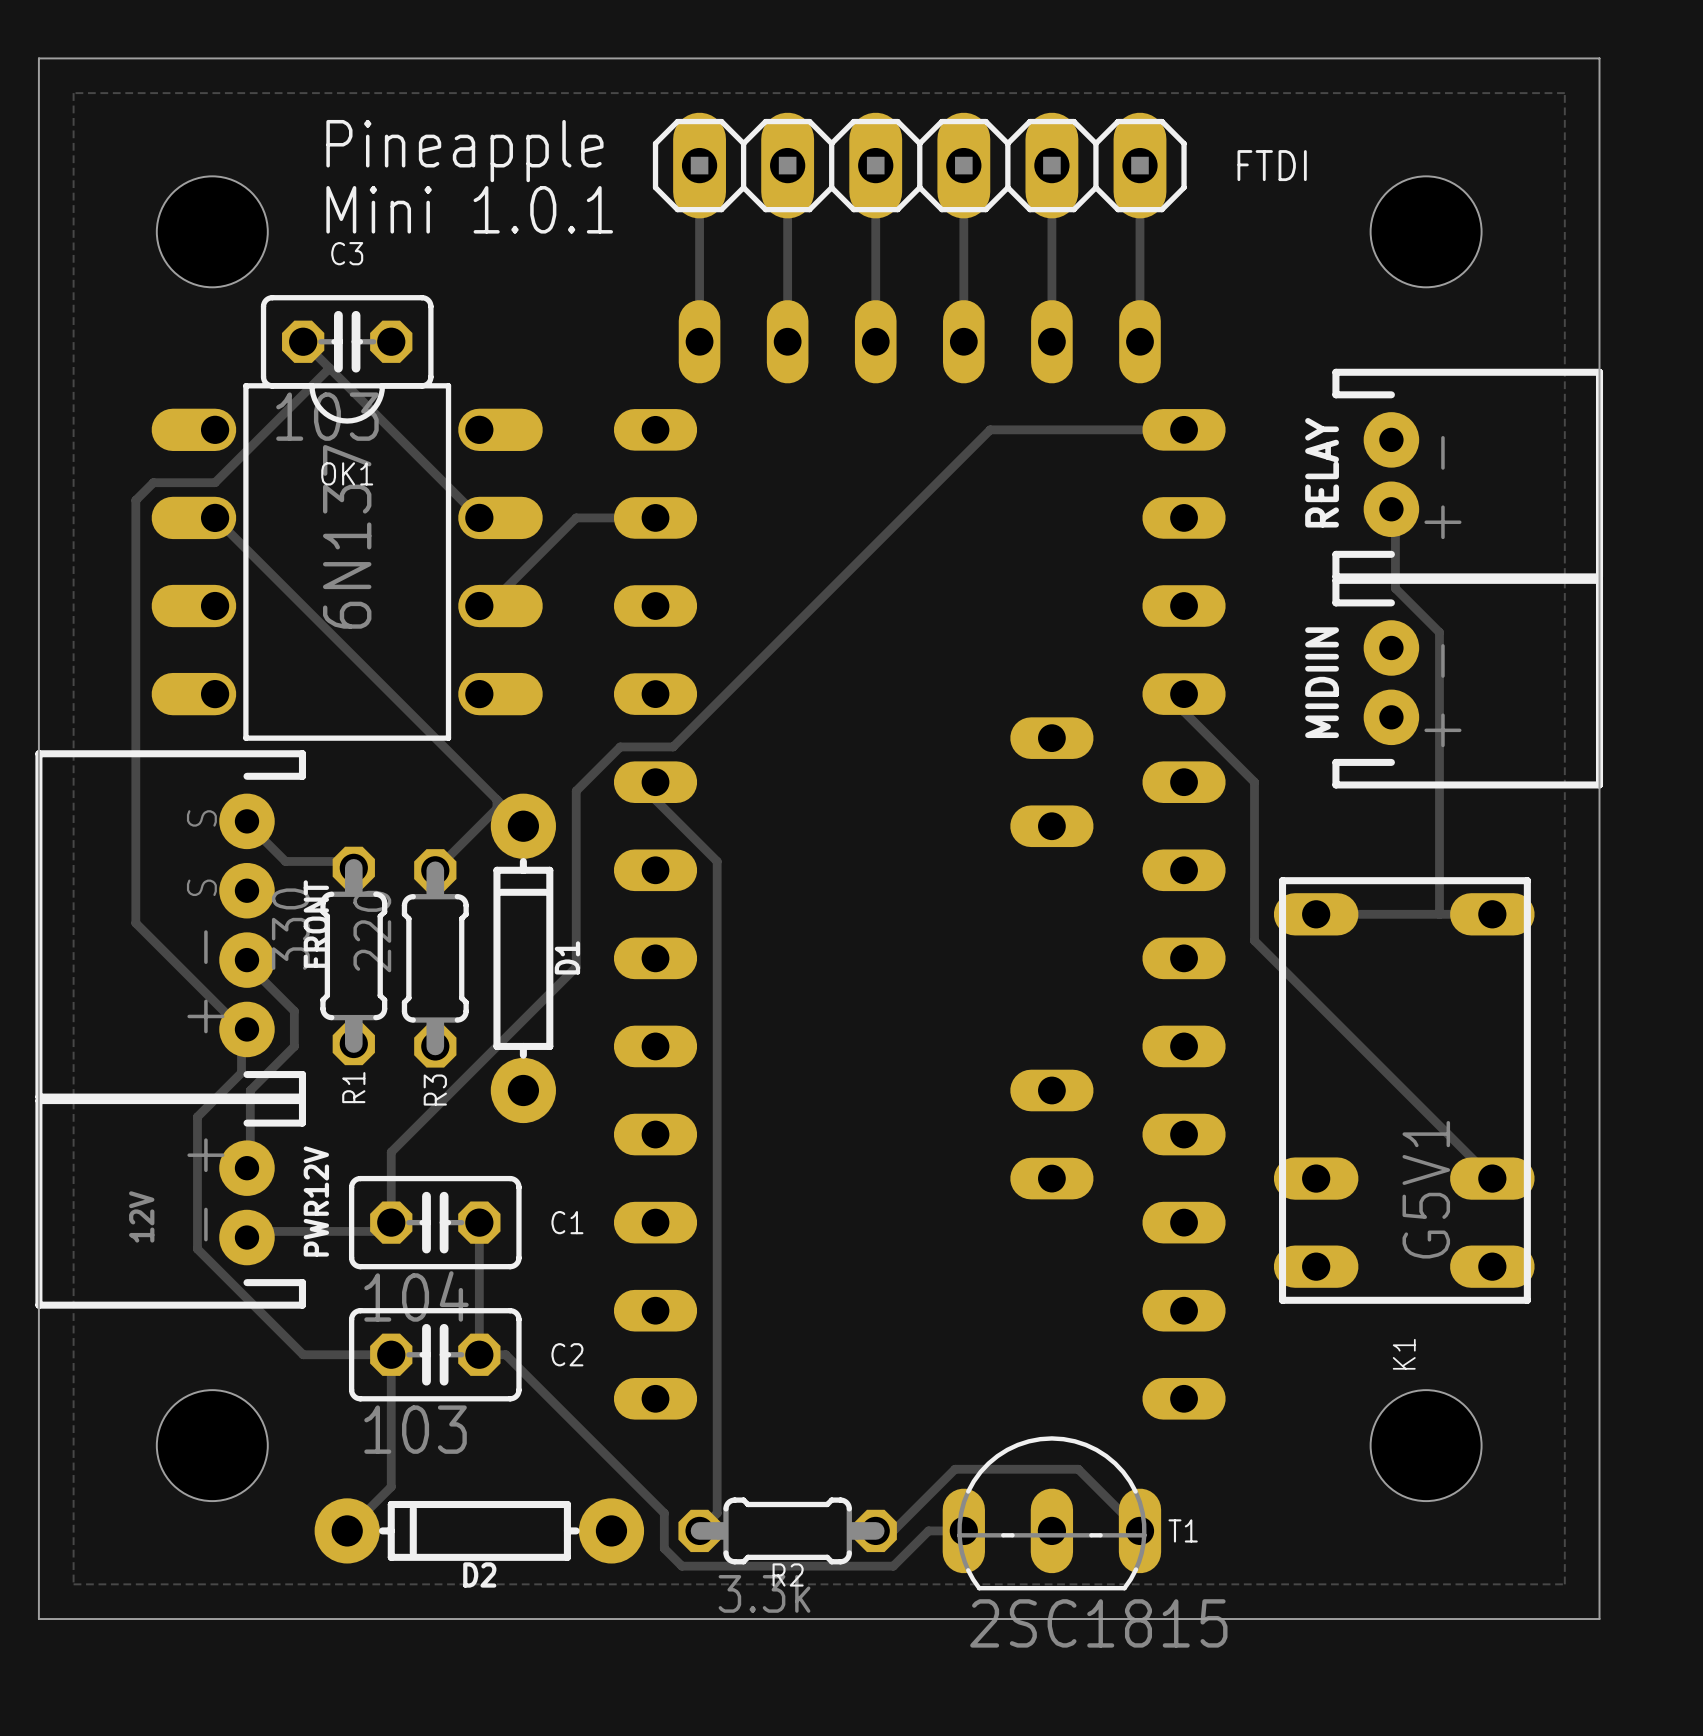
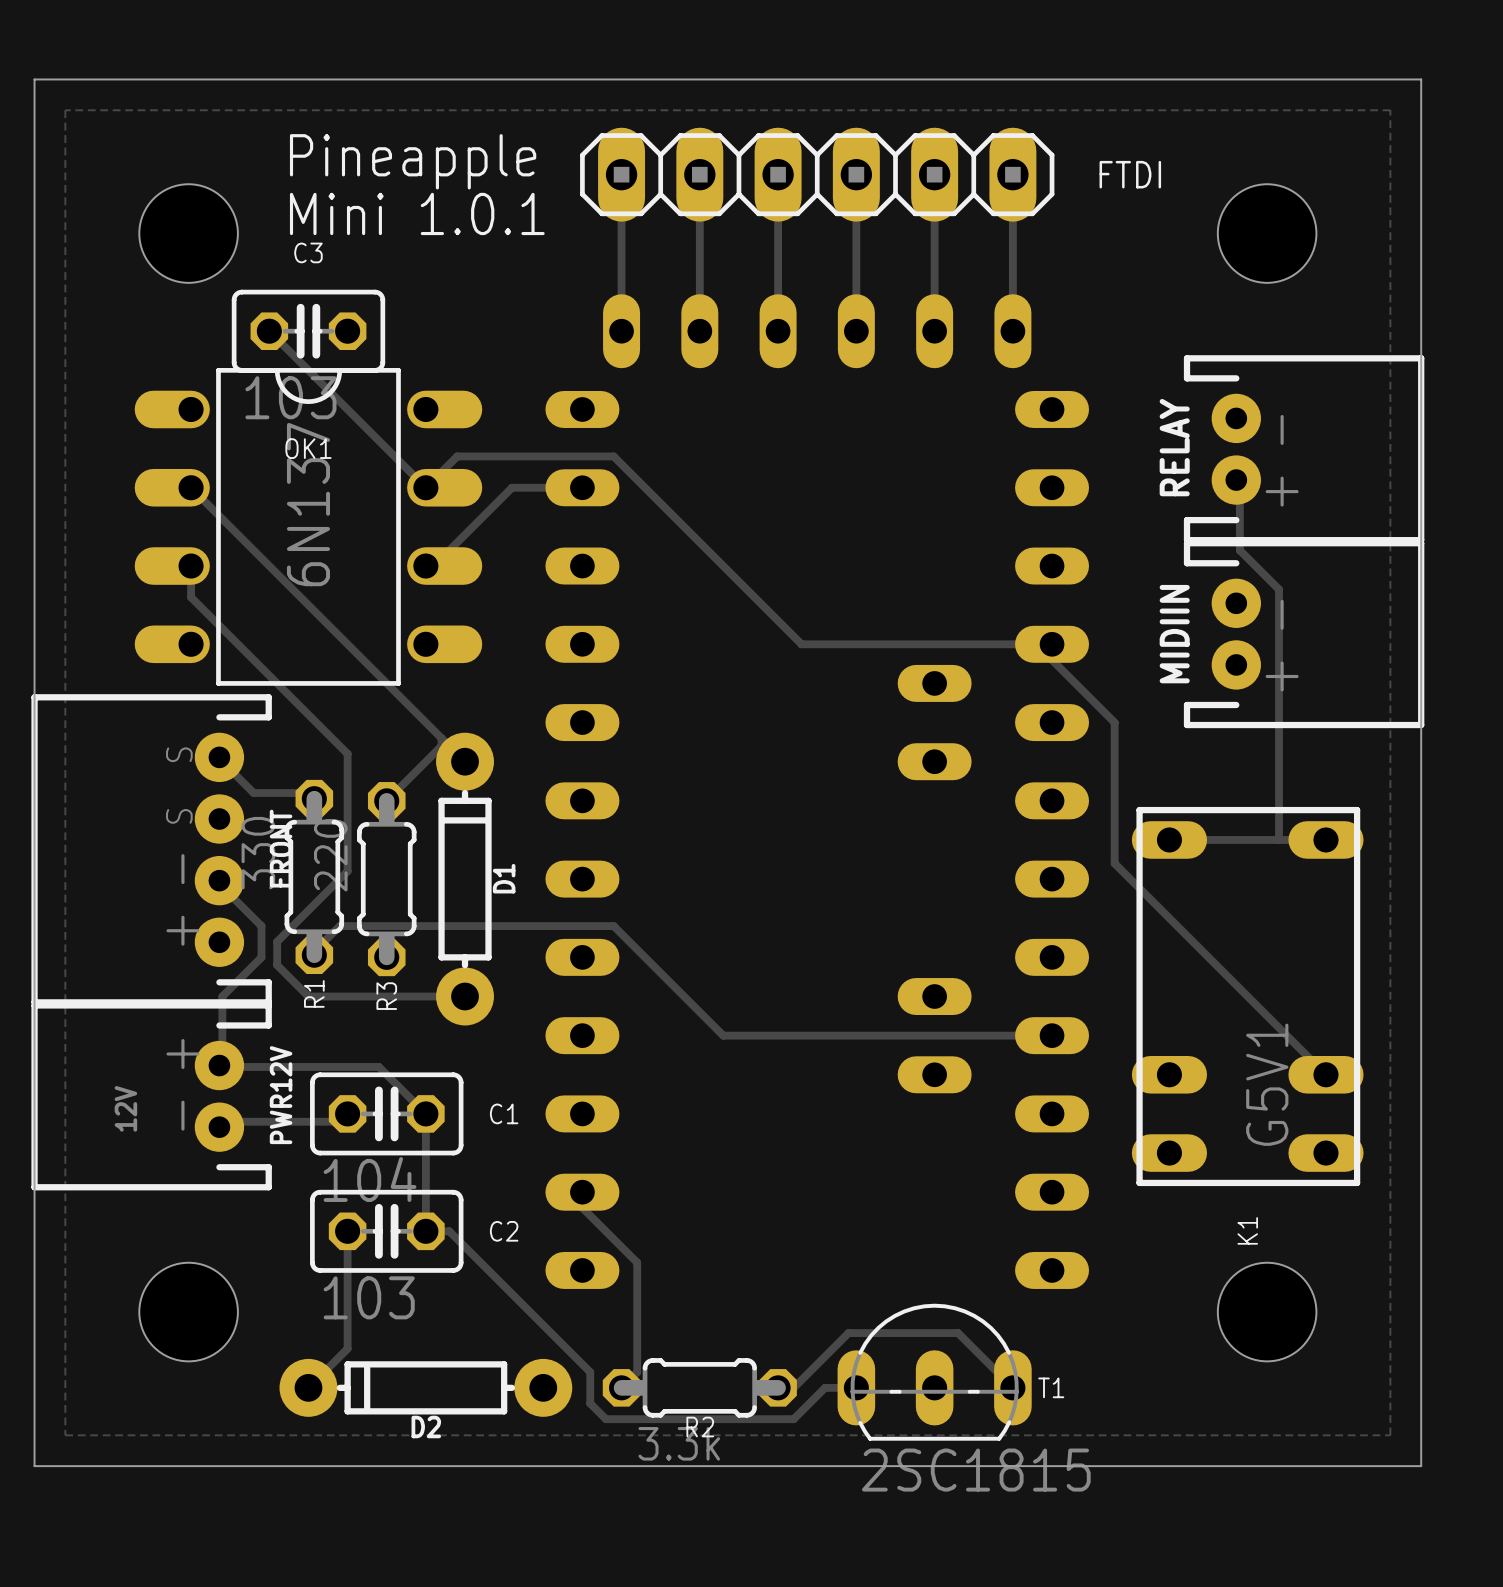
track: (329, 368) (215, 482) (153, 482) (135, 500) (135, 923) (241, 1028) (246, 1029) (241, 1037) (241, 1072) (197, 1116) (197, 1249) (303, 1354) (391, 1354) -> none
track: (1184, 429) (990, 429) (673, 746) (620, 746) (576, 791) (576, 967) (391, 1152) (391, 1222) -> none
track: none -> (425, 487) (457, 456) (613, 456) (801, 644) (1052, 644)
track: none -> (191, 566) (191, 597) (347, 753) (347, 871) (277, 941) (277, 965) (308, 996) (465, 996)
track: (655, 782) (655, 799) (717, 861) (717, 1389) -> (582, 1192) (582, 1207) (637, 1262)
track: none -> (314, 955) (316, 949) (339, 926) (613, 926) (723, 1035) (1052, 1035)
track: none -> (219, 1065) (378, 1066) (425, 1113)

